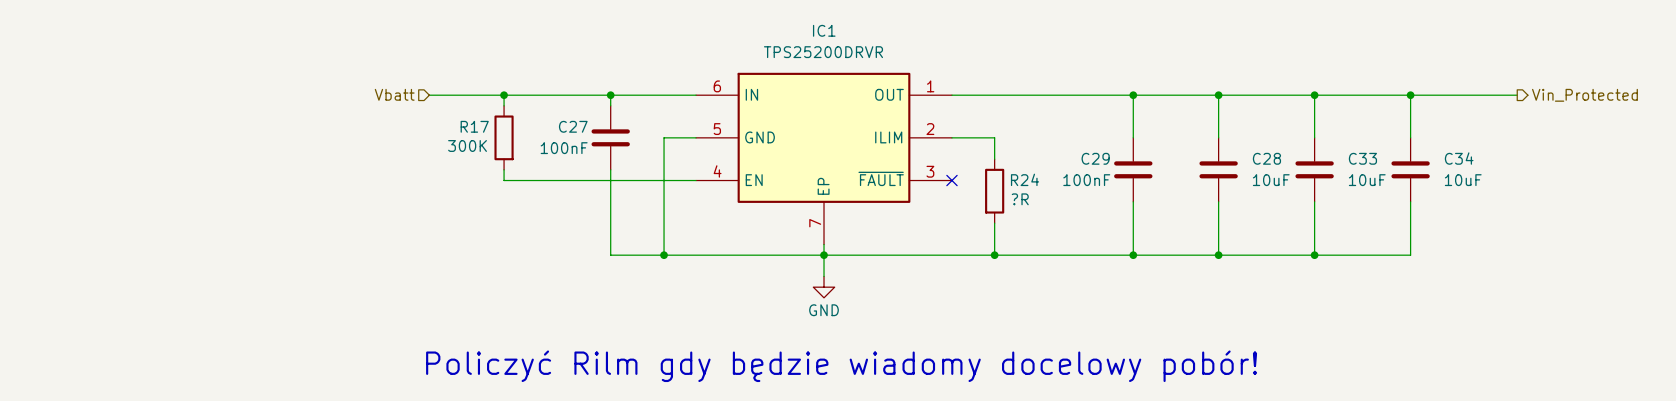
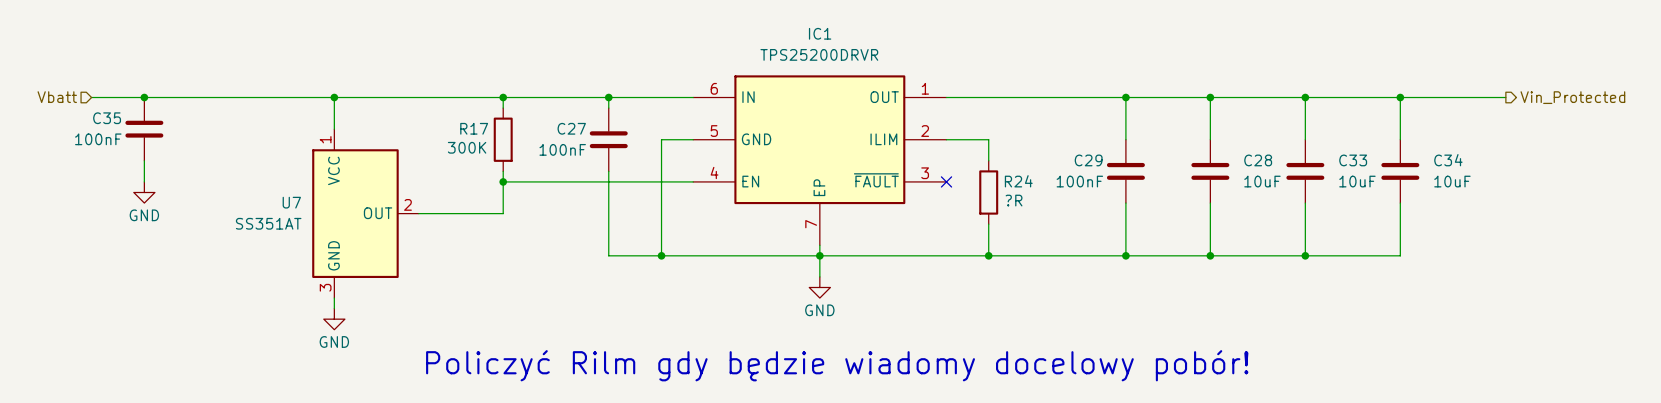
hierarchical label: none -> Vbatt (57, 97)
hierarchical label: Vbatt (394, 94) -> none
wire: none -> (91, 97) (429, 97)
junction: none -> (144, 97)
wire: none -> (334, 97) (334, 129)
junction: none -> (334, 97)
C35: none -> 100nF (144, 129)
wire: none -> (144, 160) (144, 181)
wire: none -> (503, 181) (503, 213) (418, 213)
junction: none -> (503, 181)
power symbol: none -> GND (144, 192)
U7: none -> SS351AT (365, 213)
wire: none -> (334, 298) (334, 308)
power symbol: none -> GND (334, 319)

